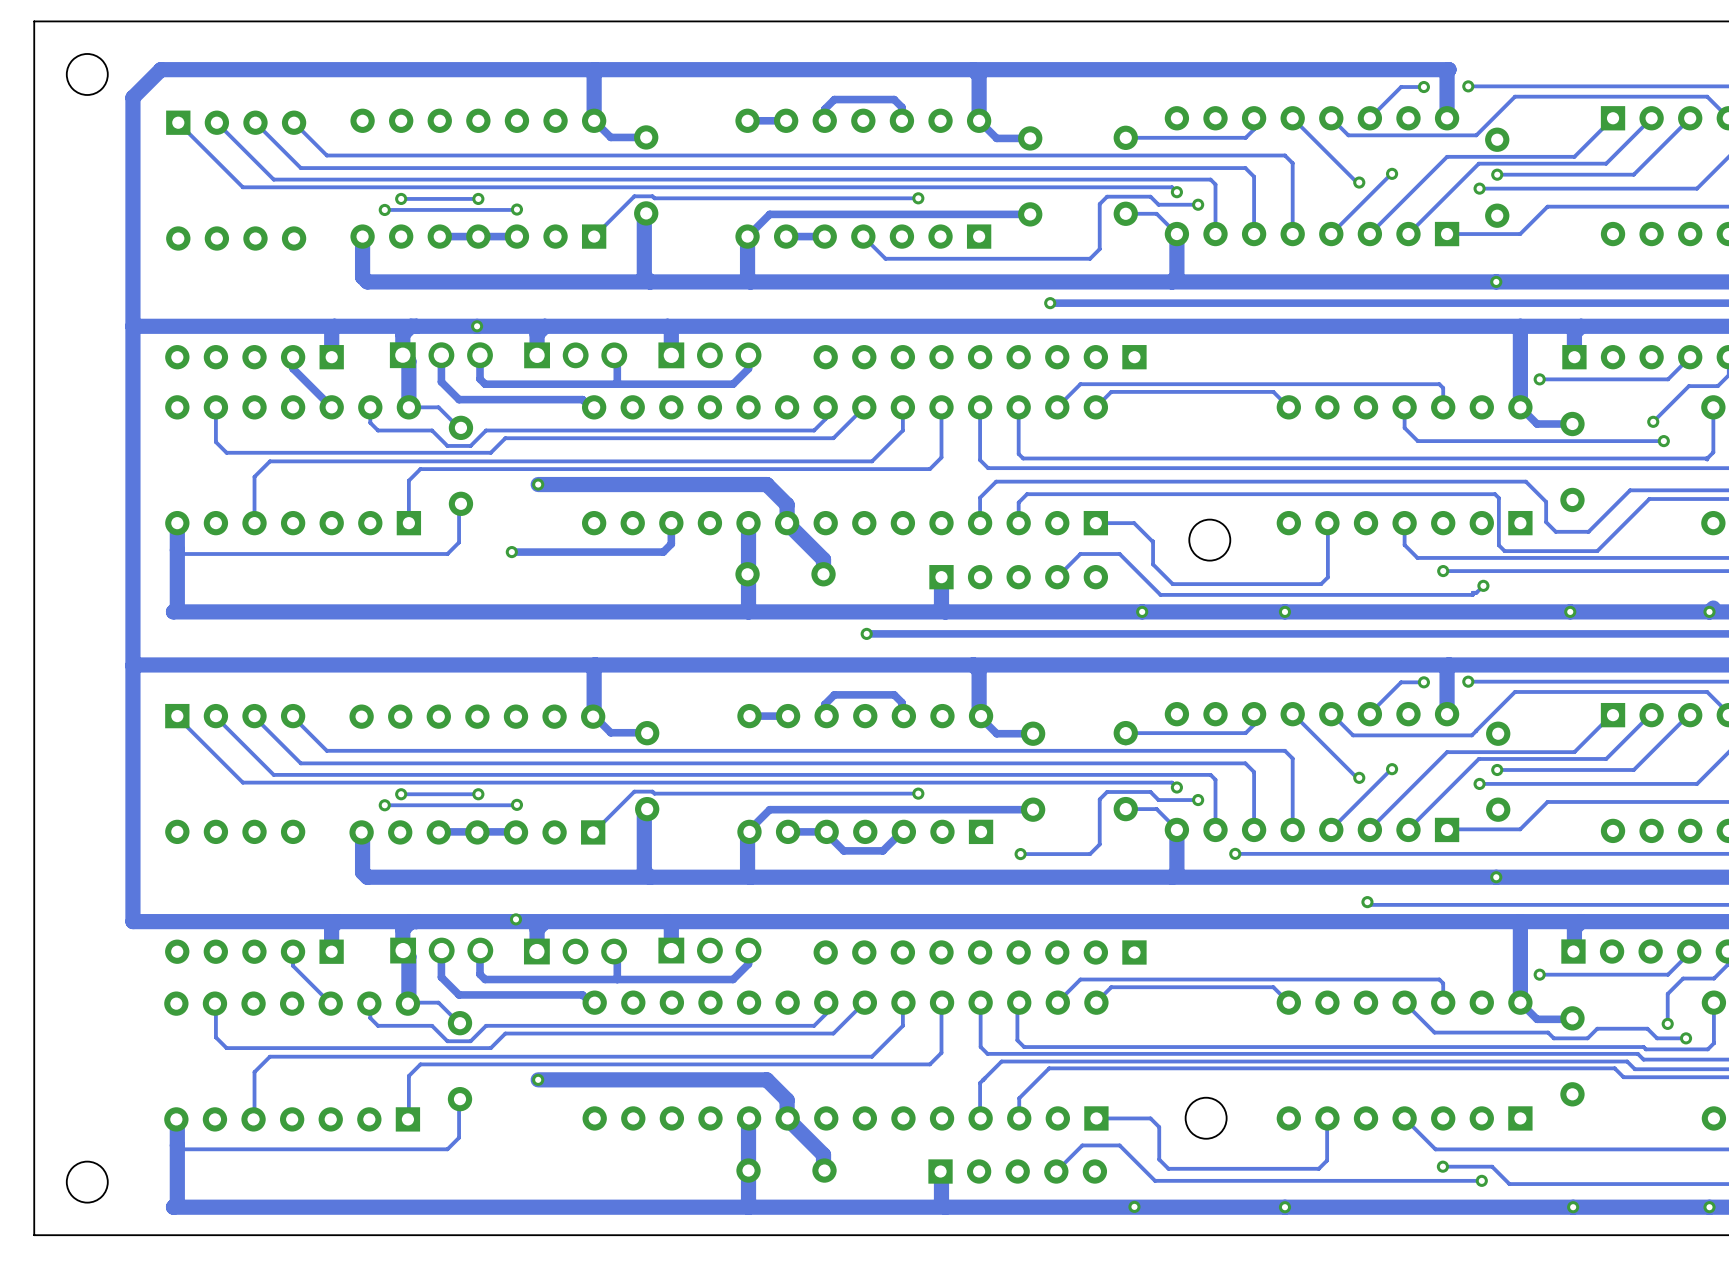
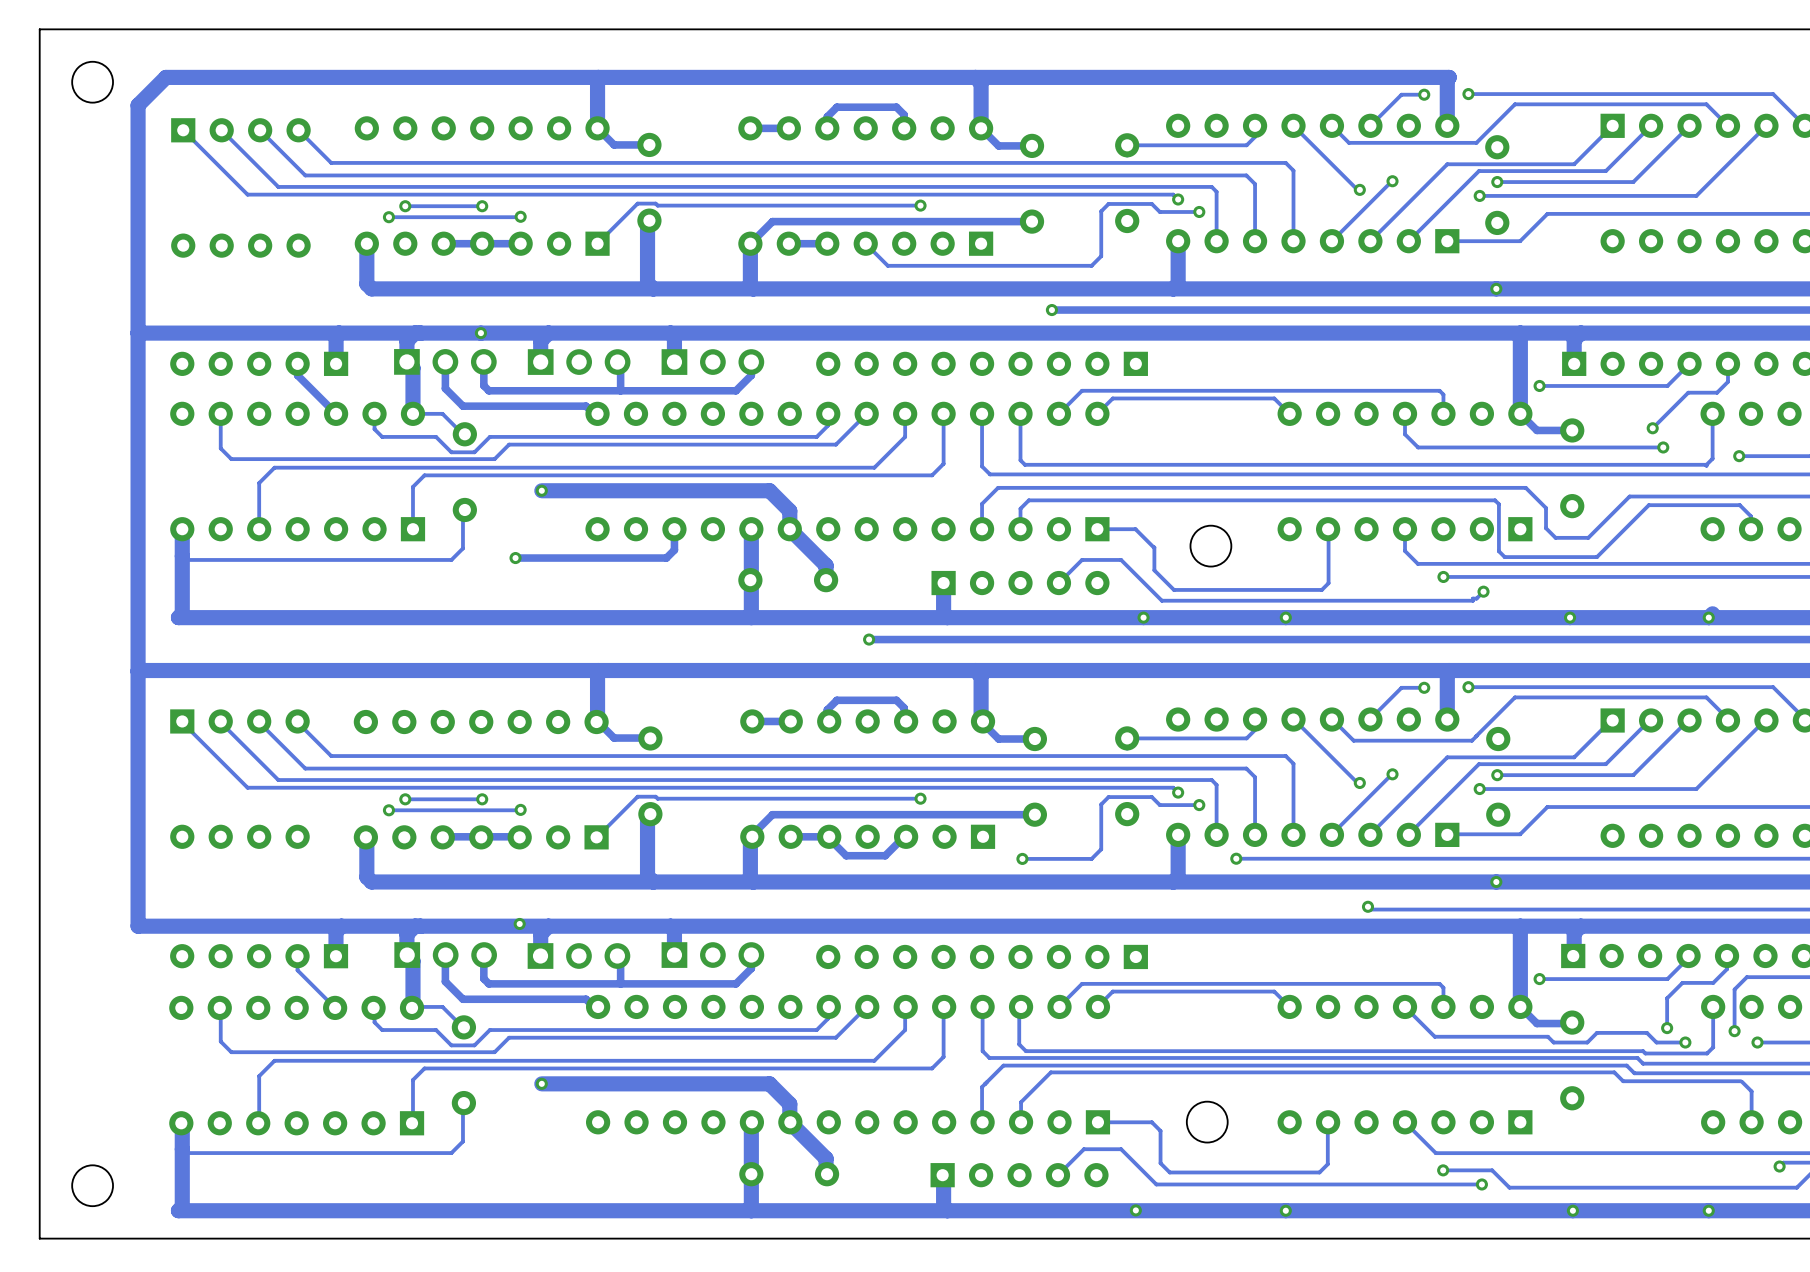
track: (1125, 213) (1156, 213) (1176, 234) -> none
track: (1125, 809) (1156, 809) (1176, 829) -> none

